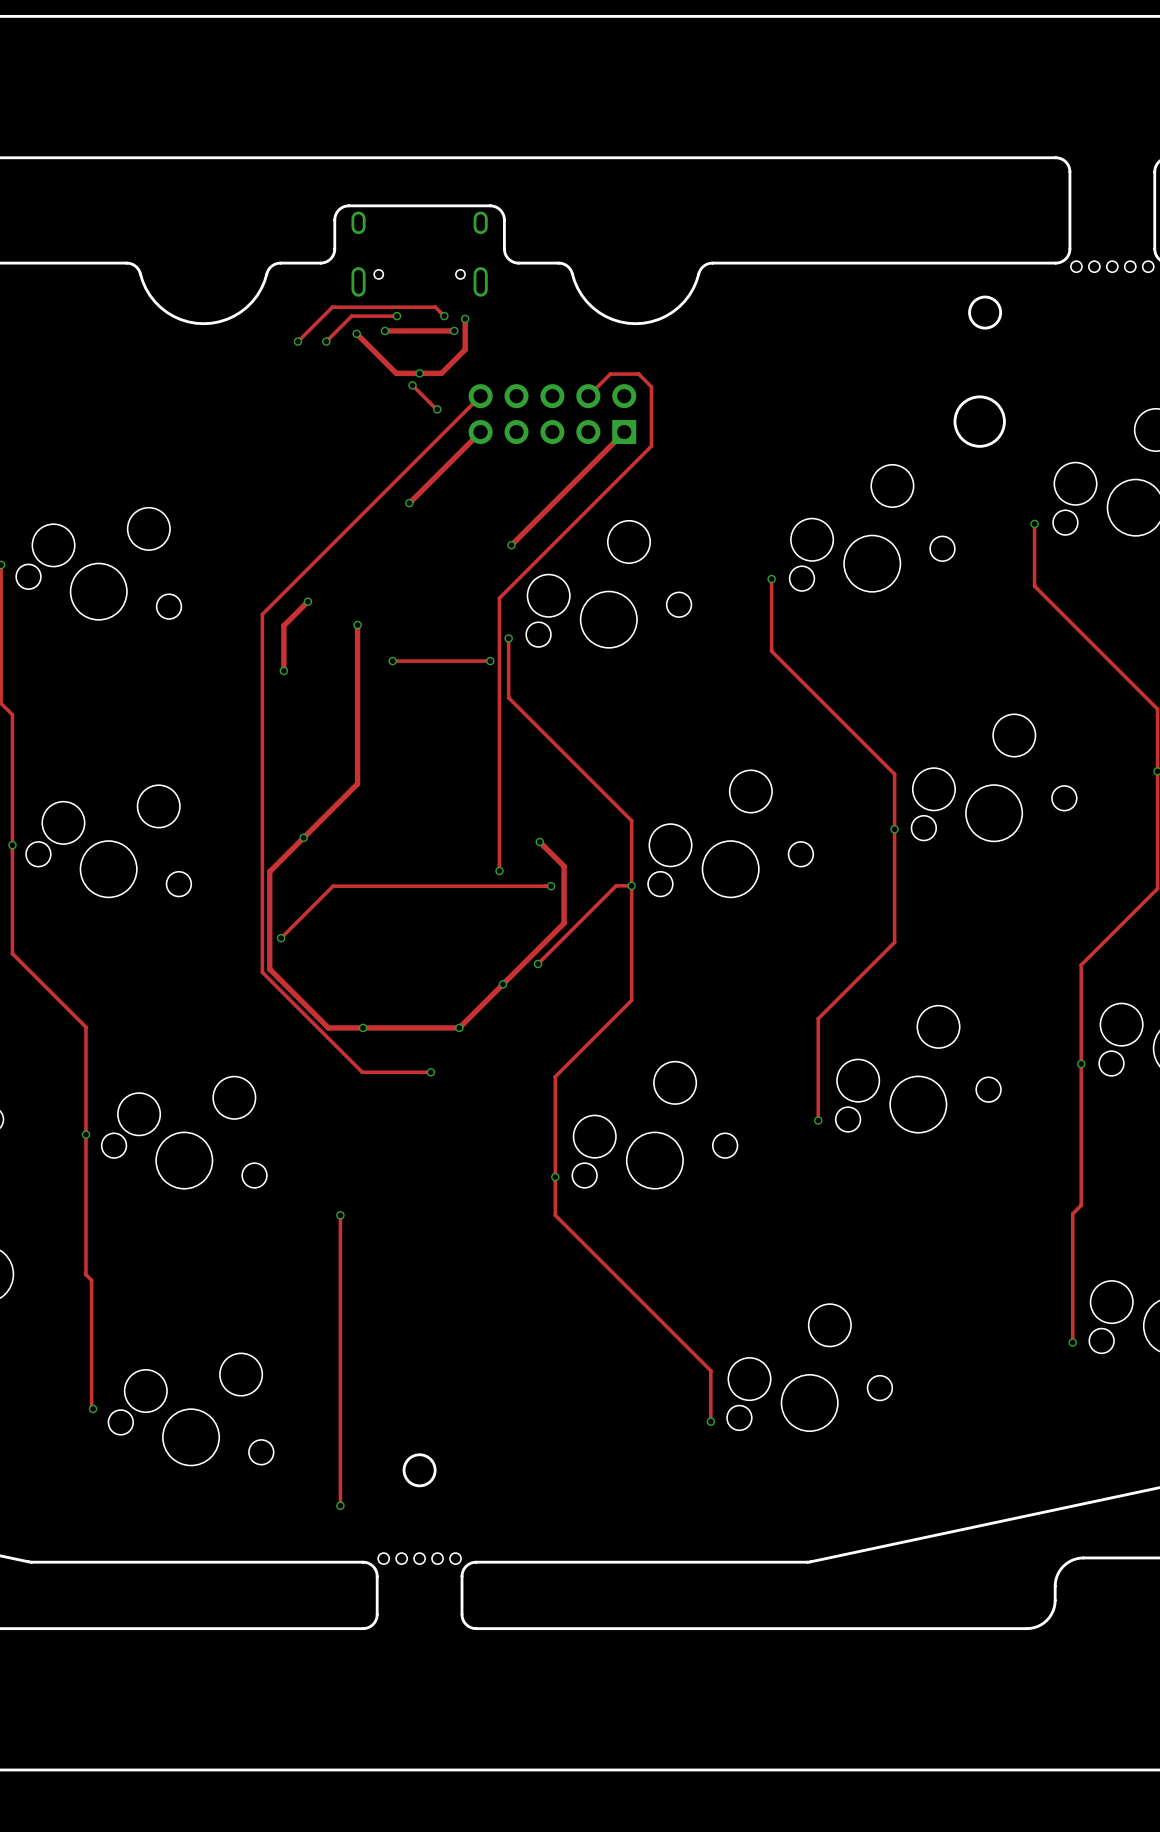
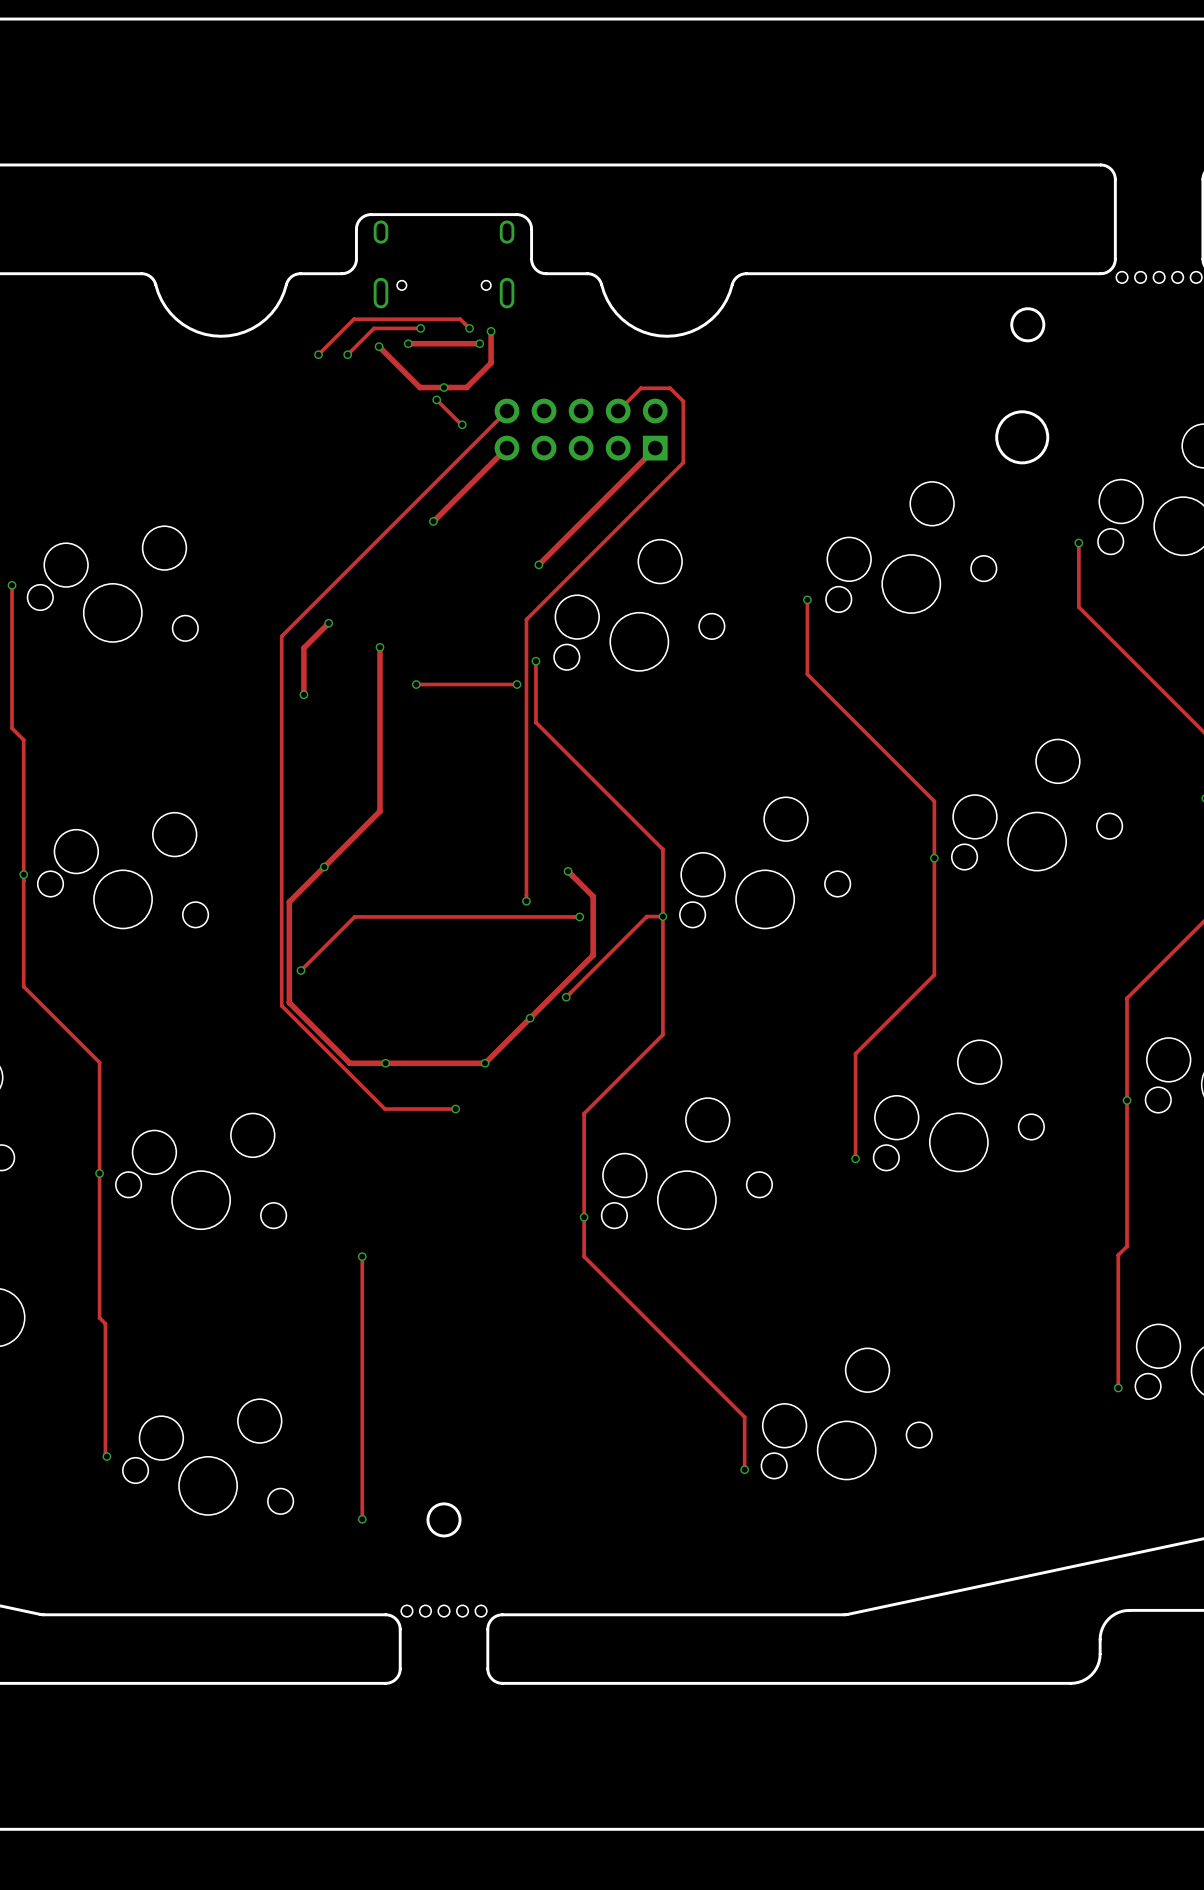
track: (340, 1469) (340, 1505) -> none
via position: (340, 1505) -> (362, 1519)

